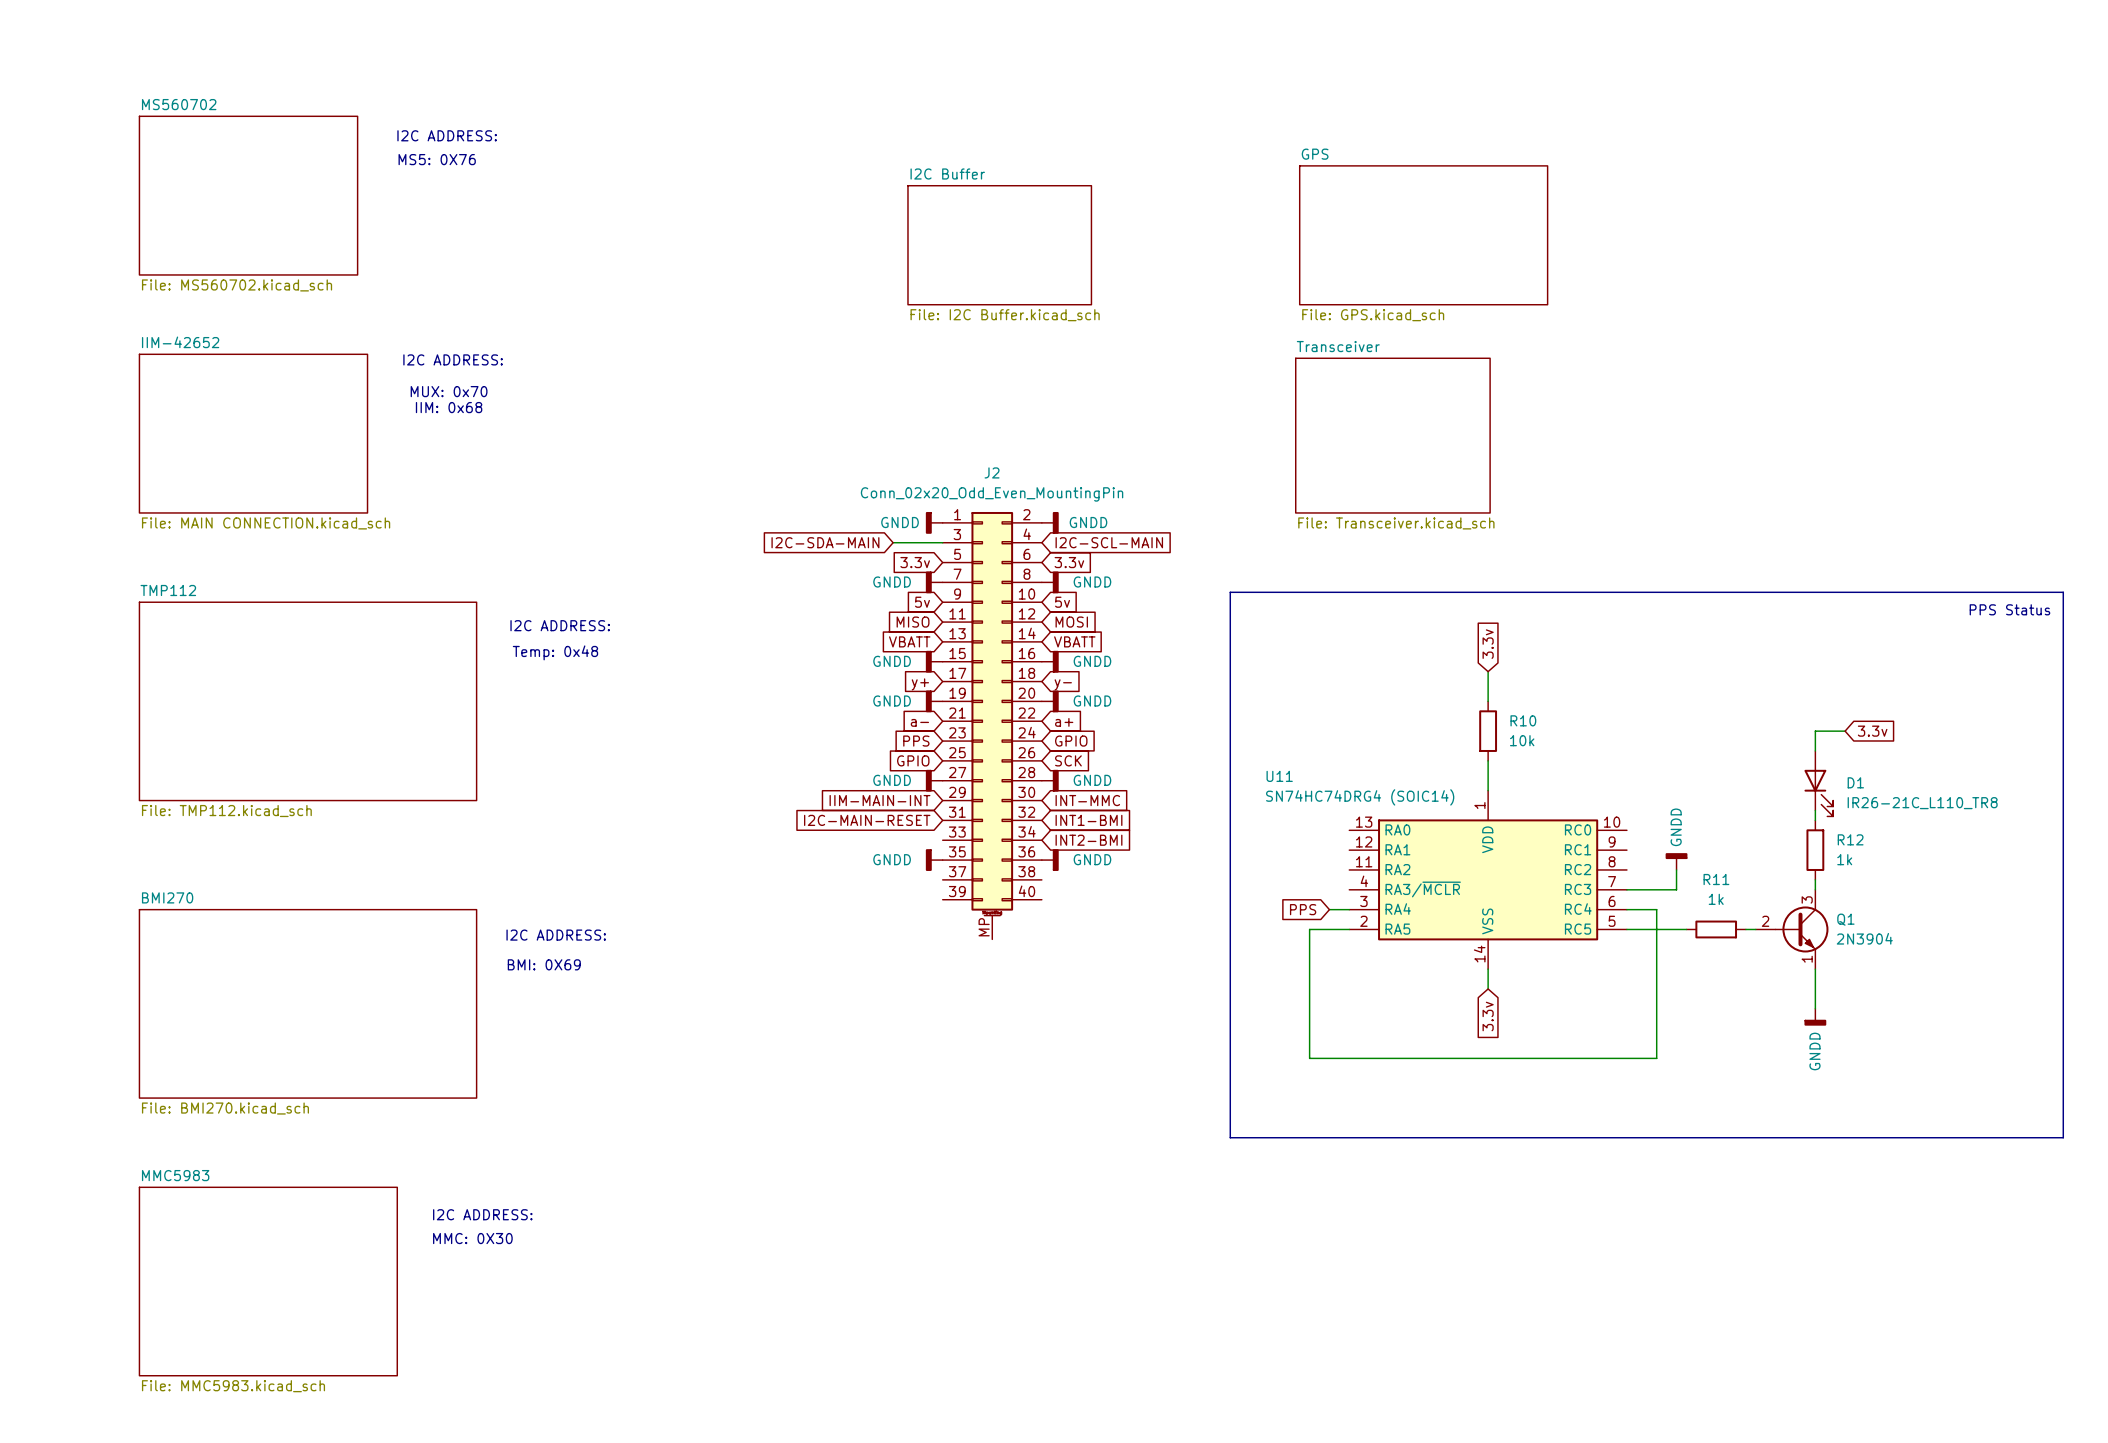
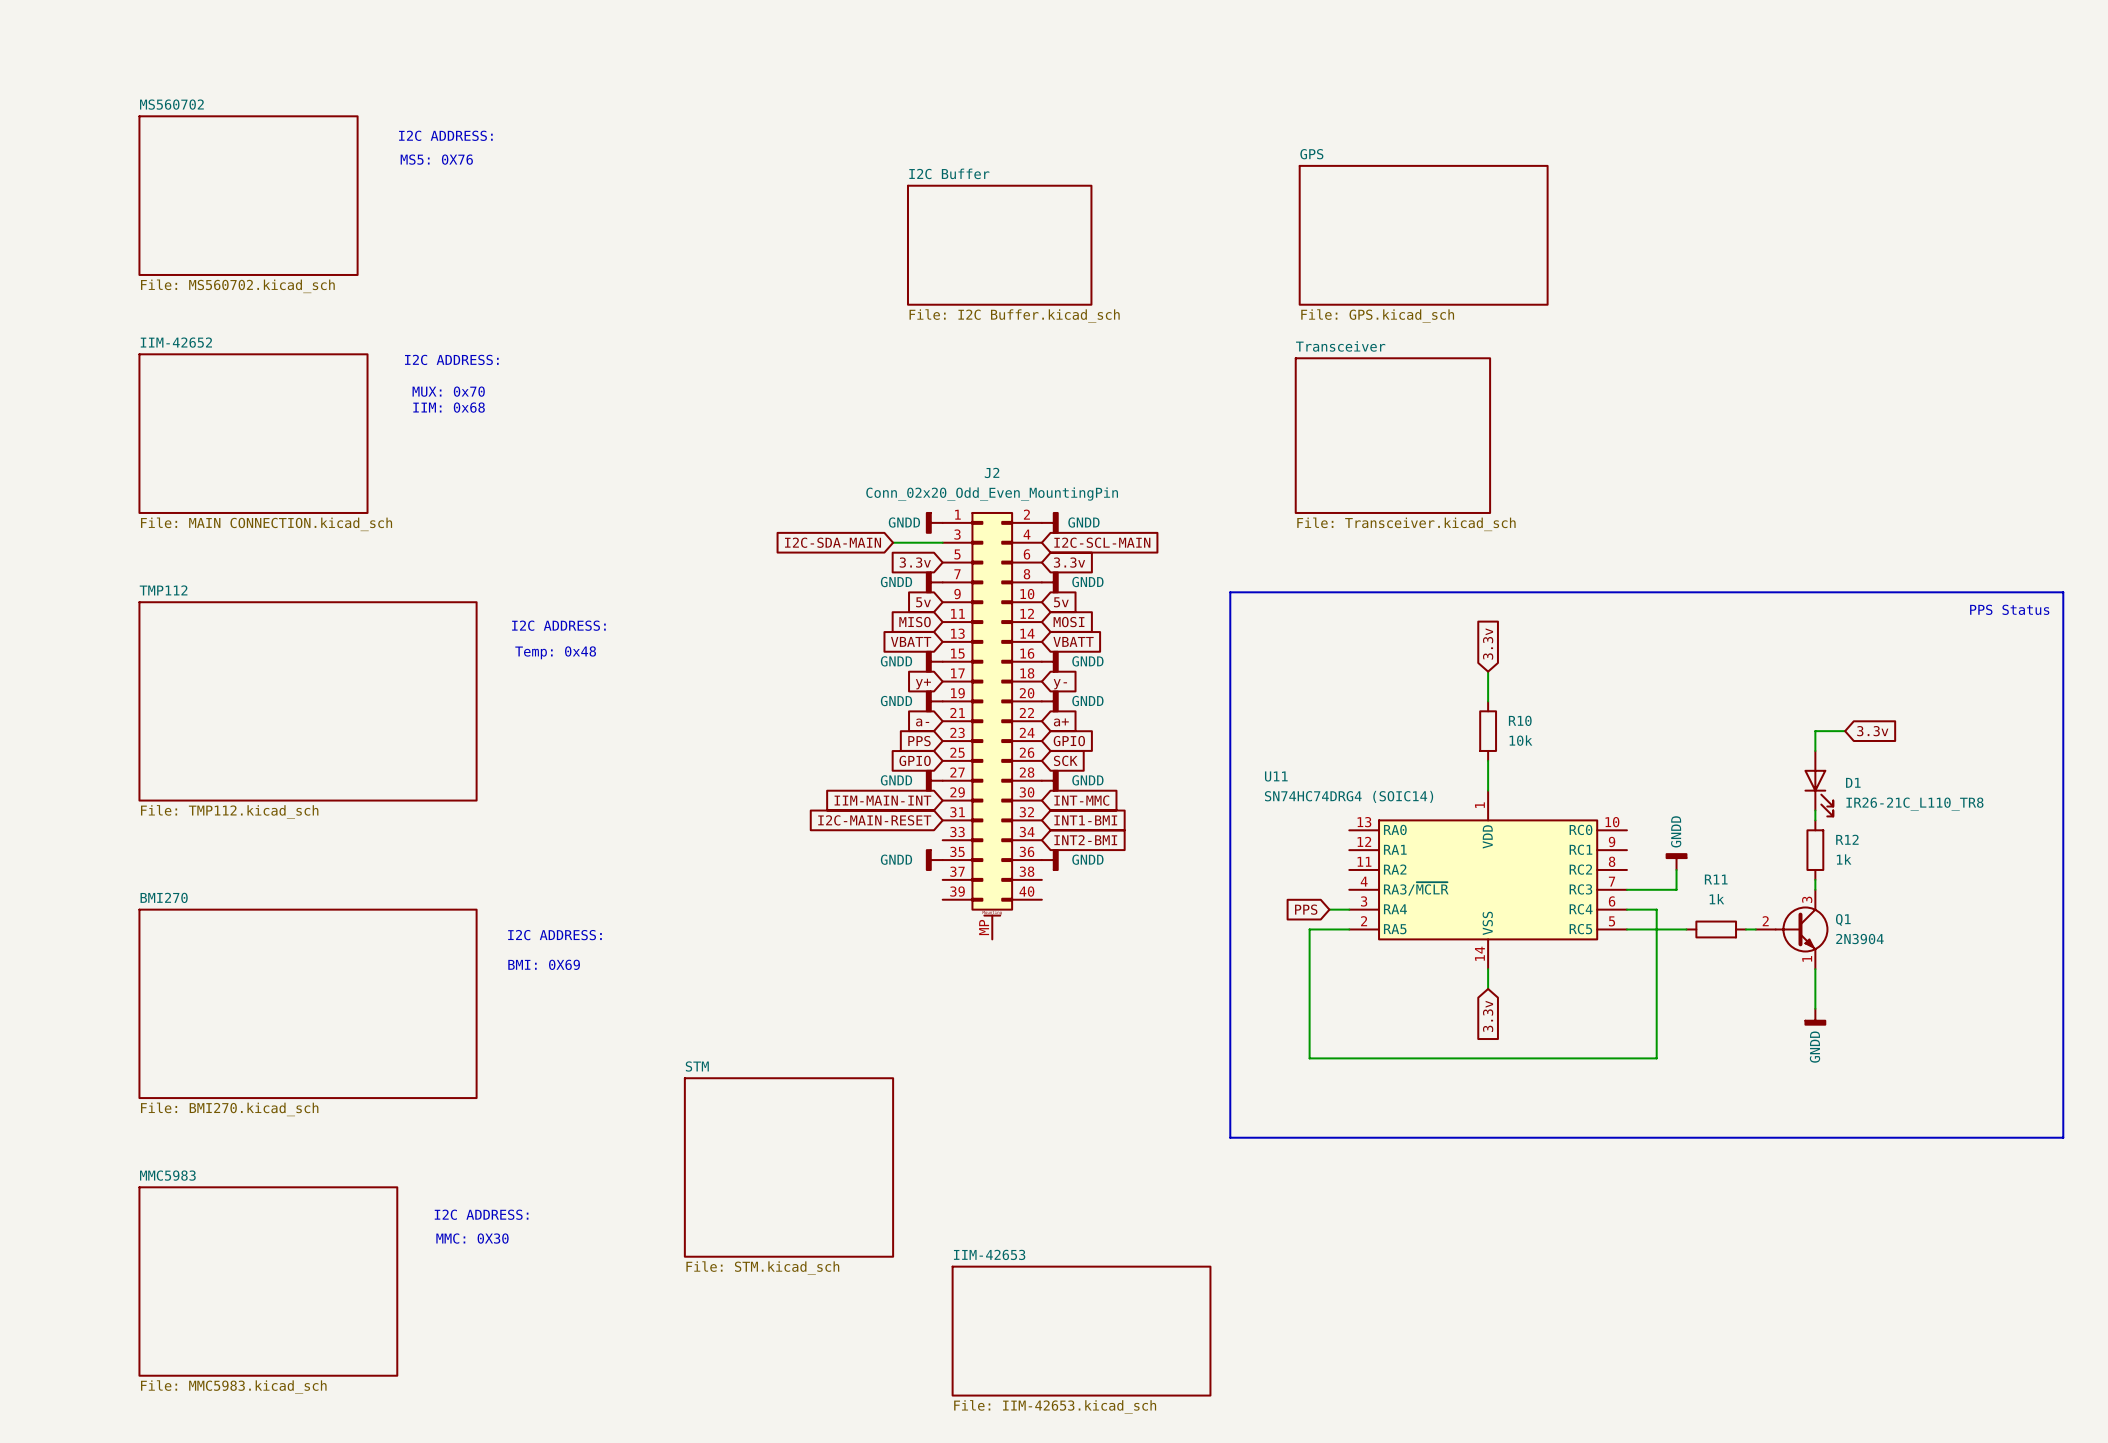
sheet STM: none -> File: STM.kicad_sch (788, 1167)
sheet IIM-42653: none -> File: IIM-42653.kicad_sch (1081, 1331)

